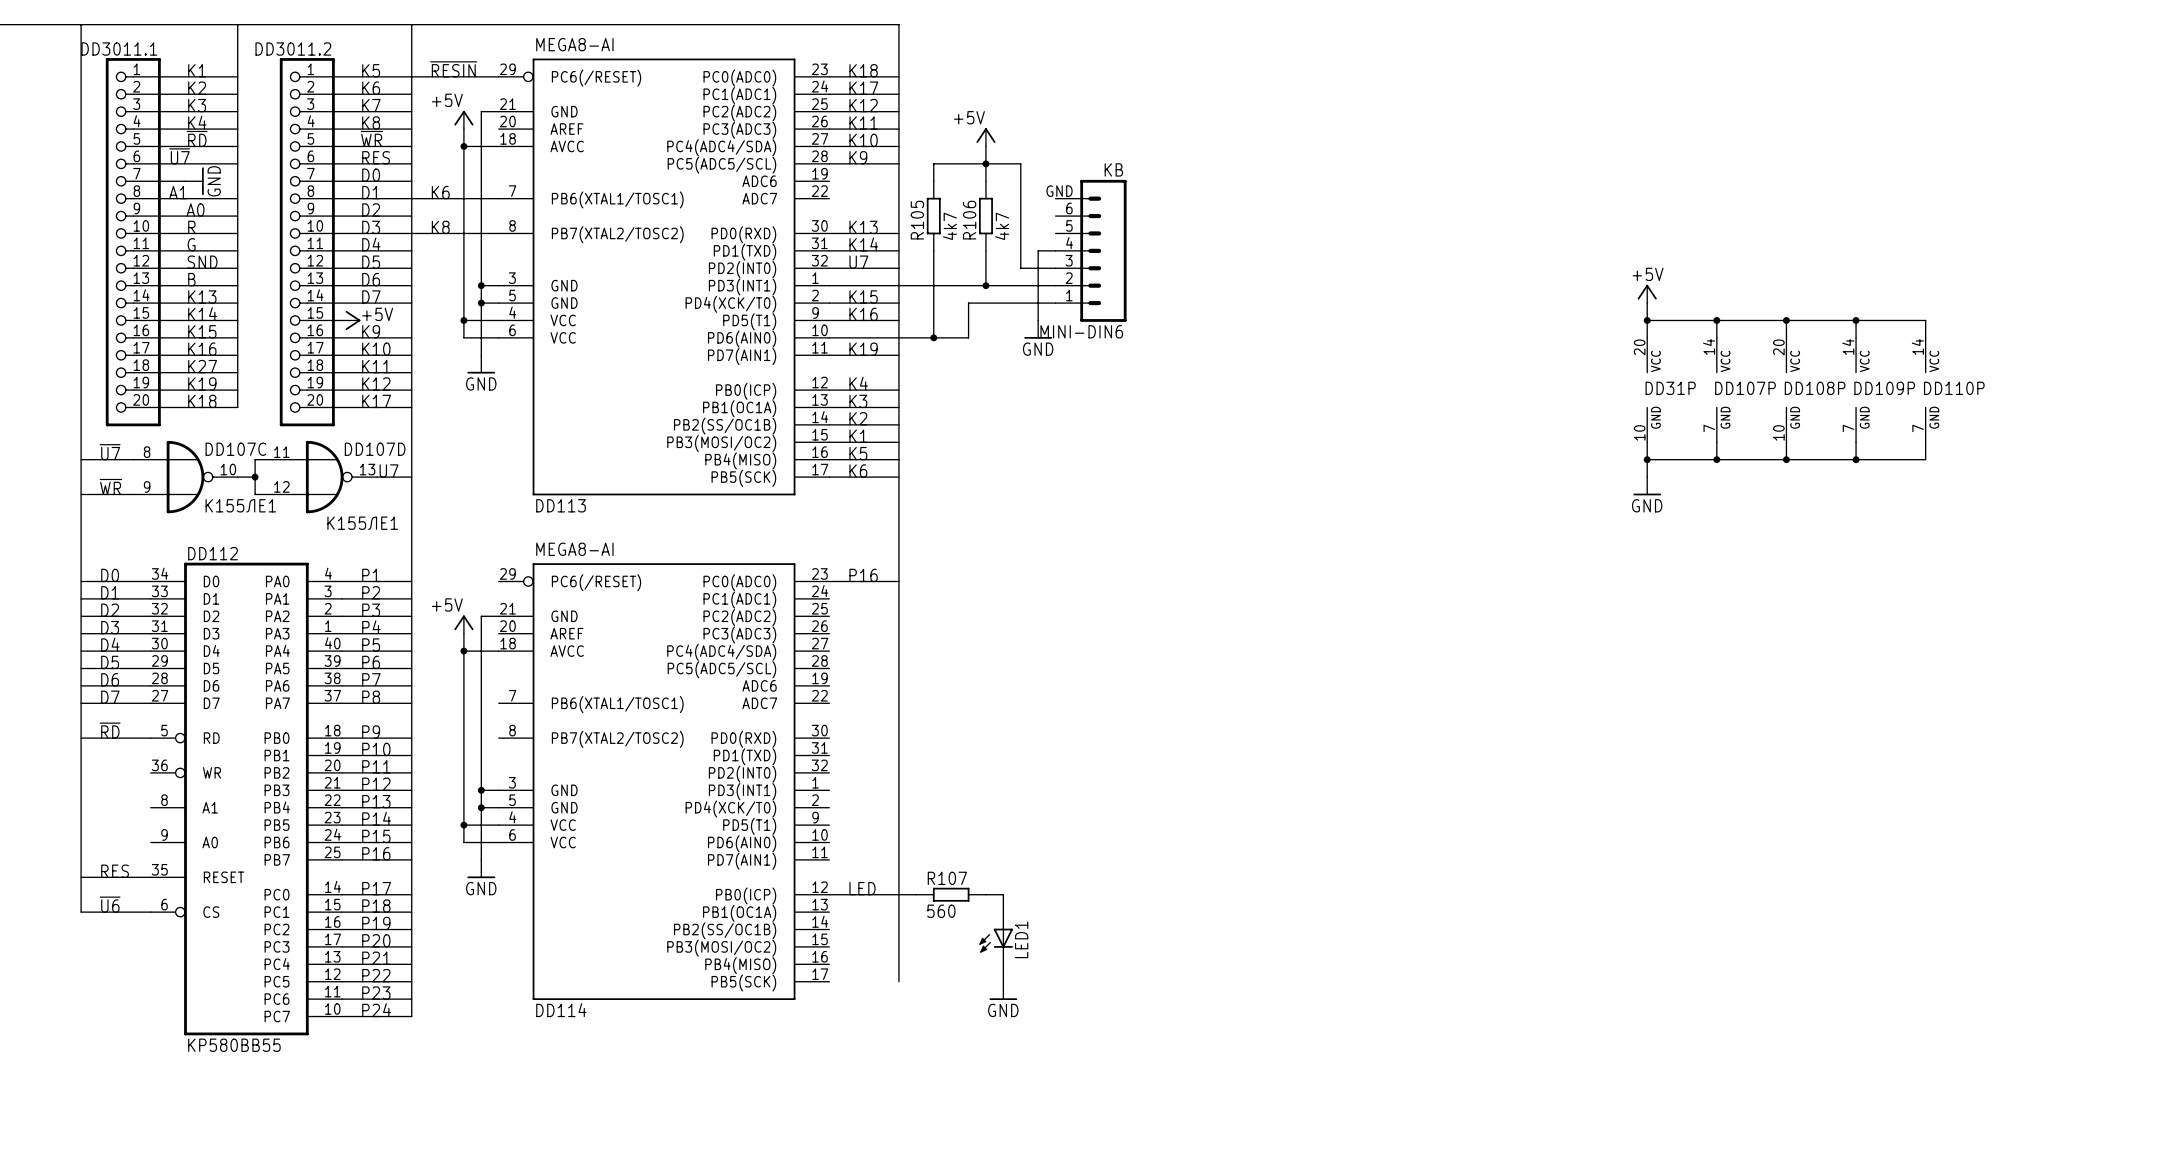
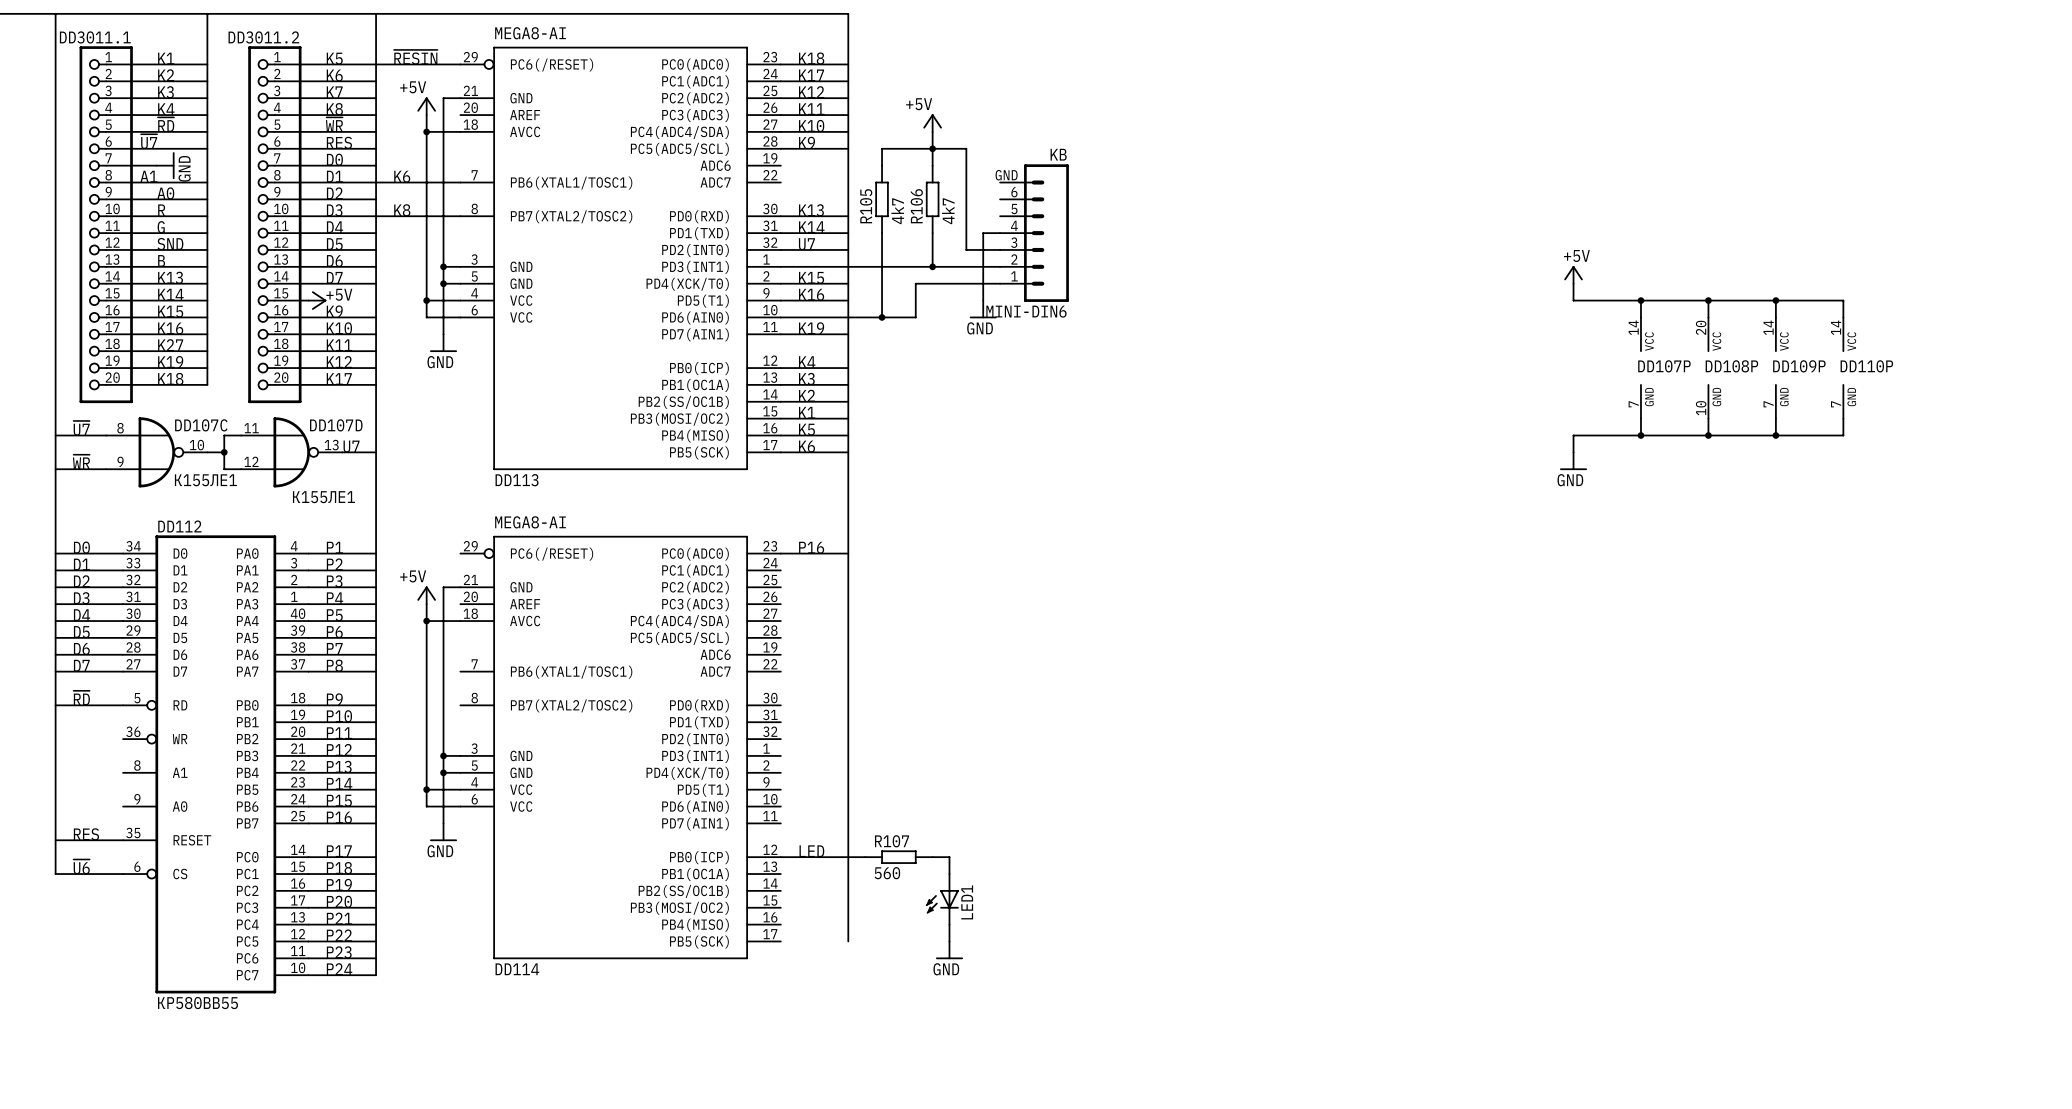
wire: (1647, 320) (1647, 337) -> none
junction: (1647, 320) -> none
DD31P: (1647, 390) -> none
wire: (1647, 442) (1647, 459) -> none
junction: (1647, 459) -> none

